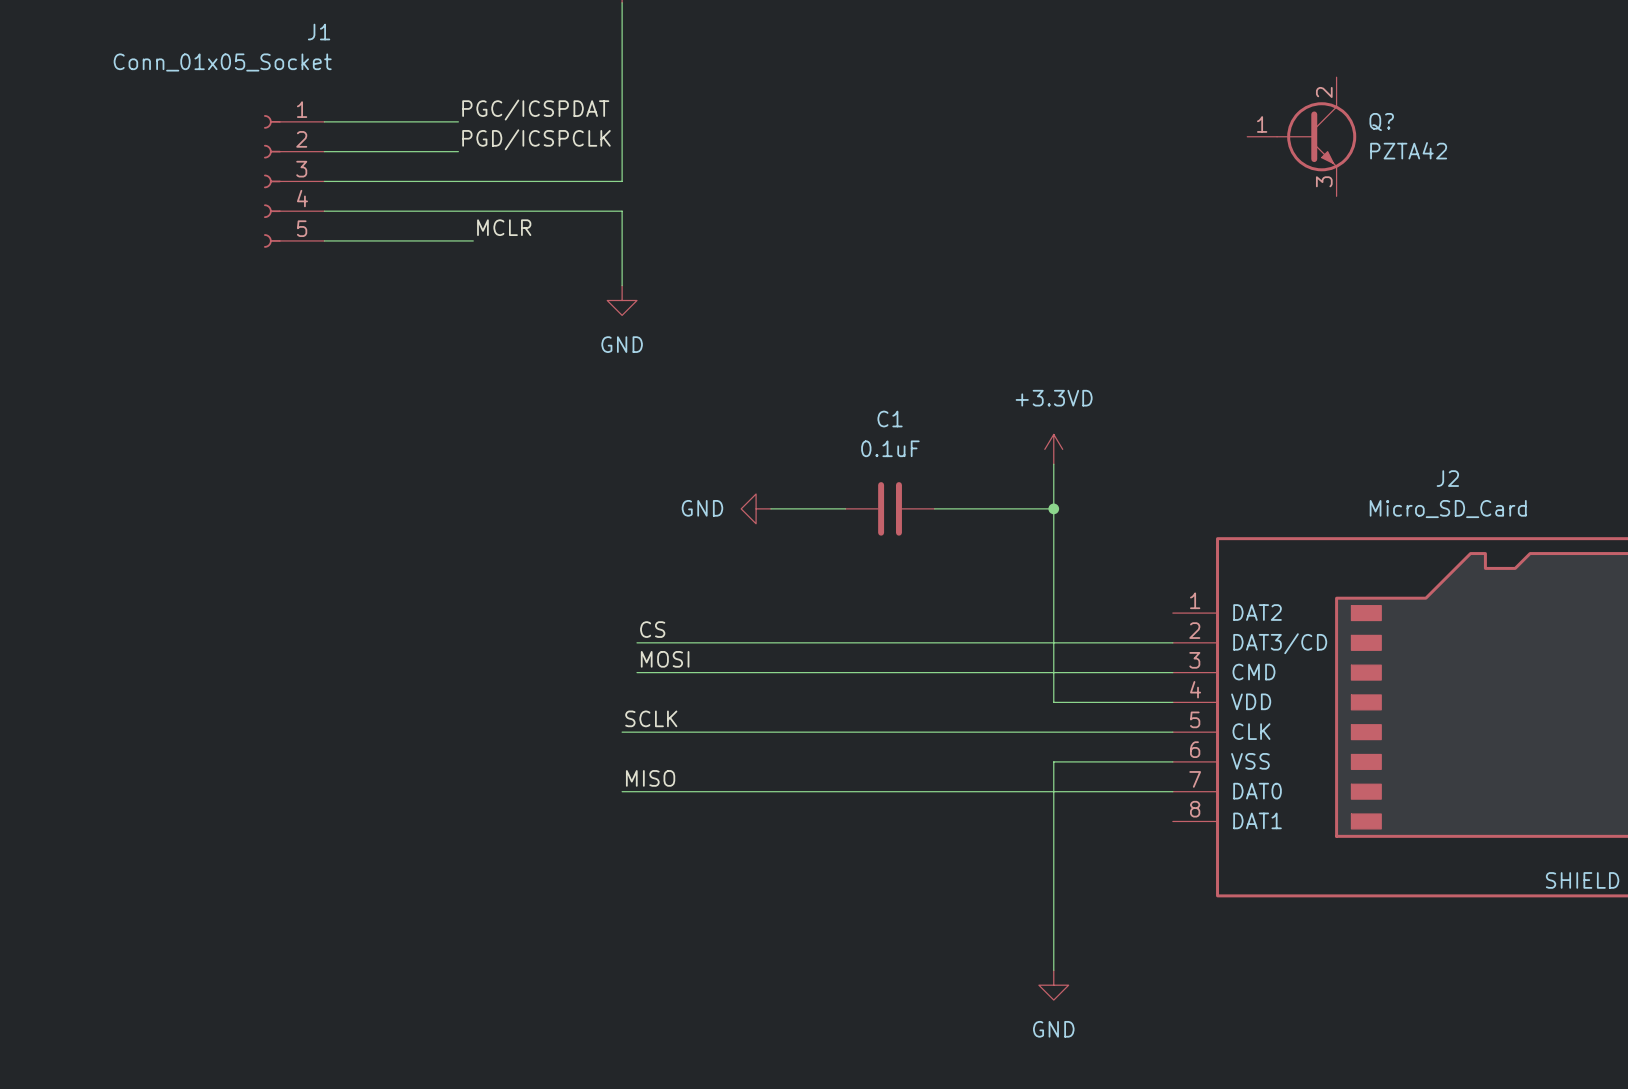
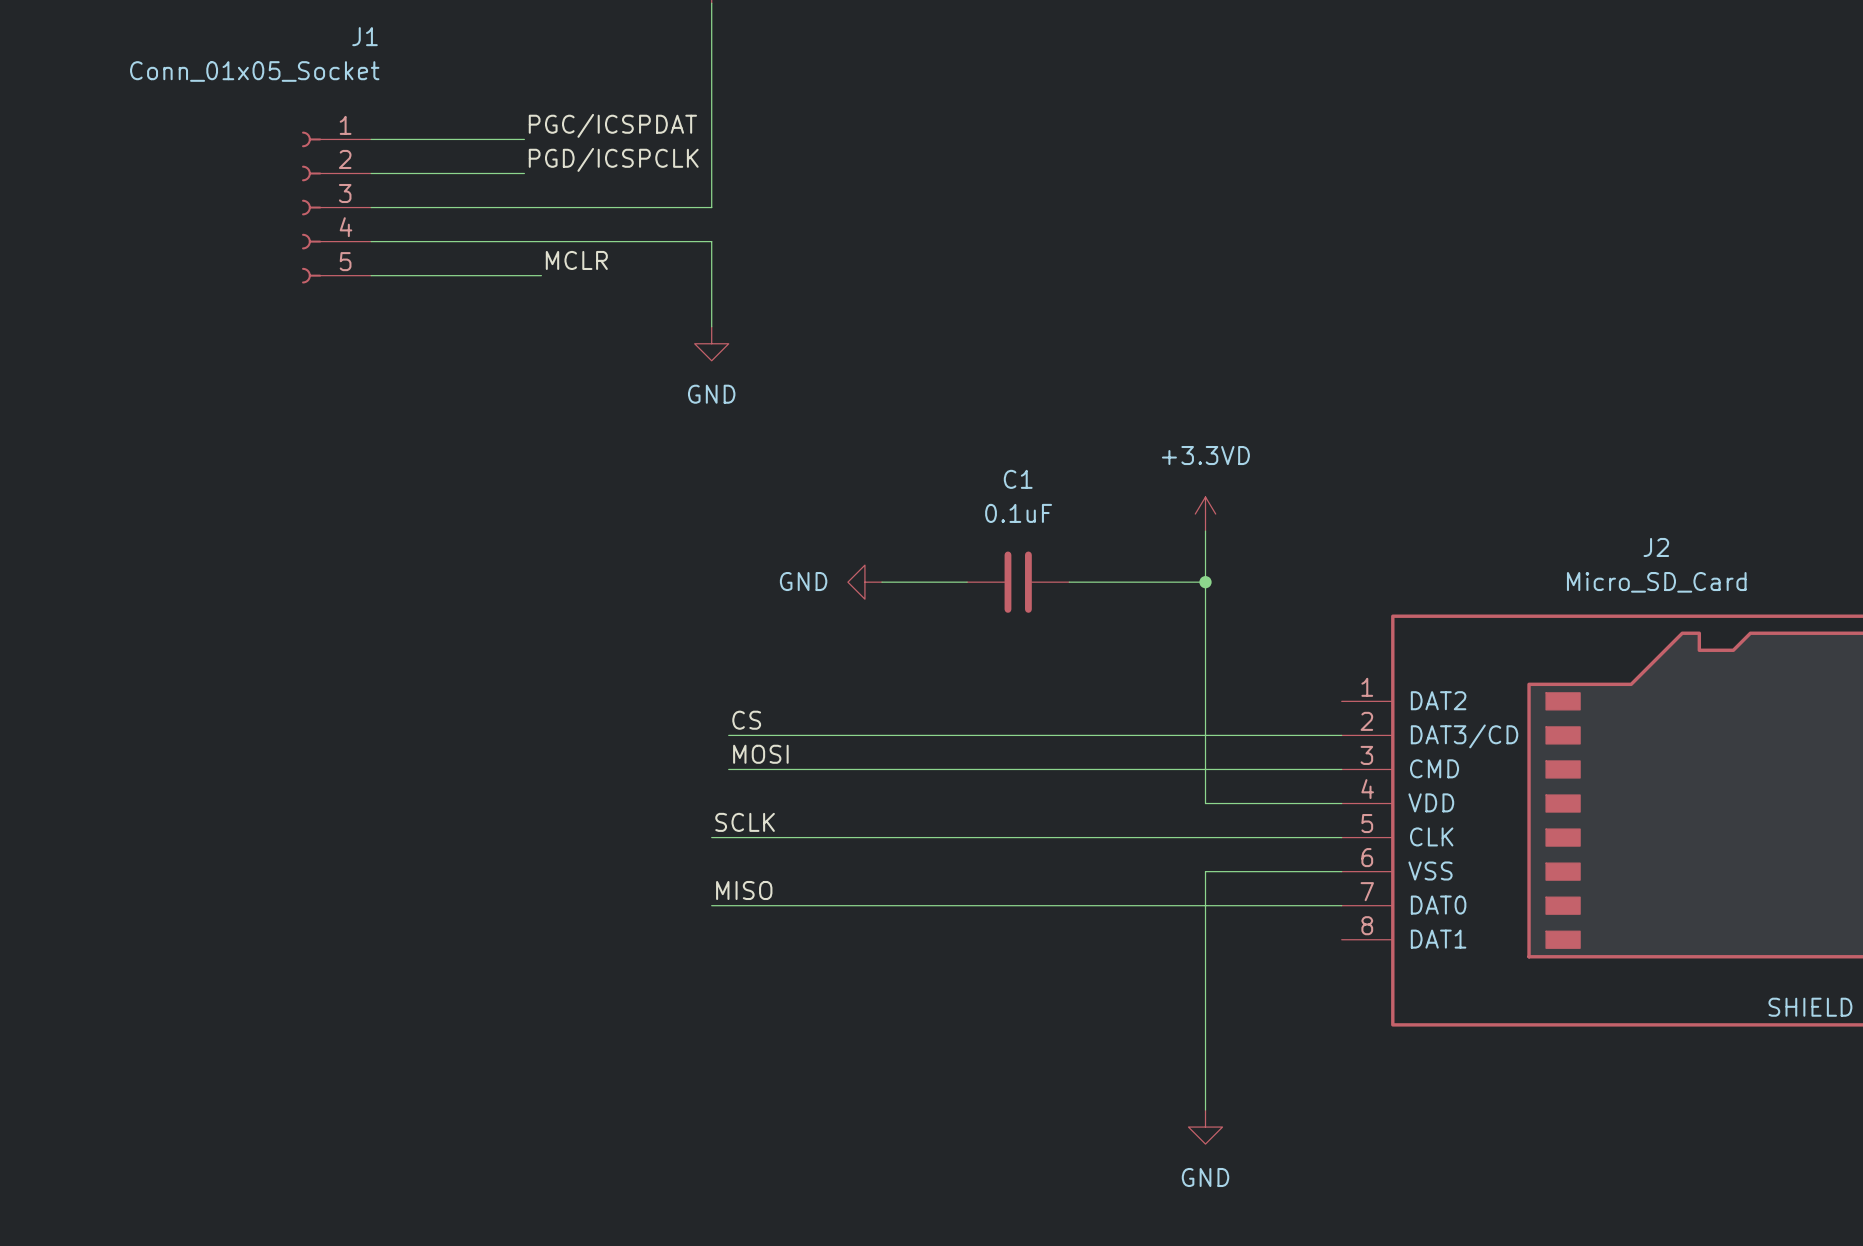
Q?: PZTA42 (1301, 136) -> none

